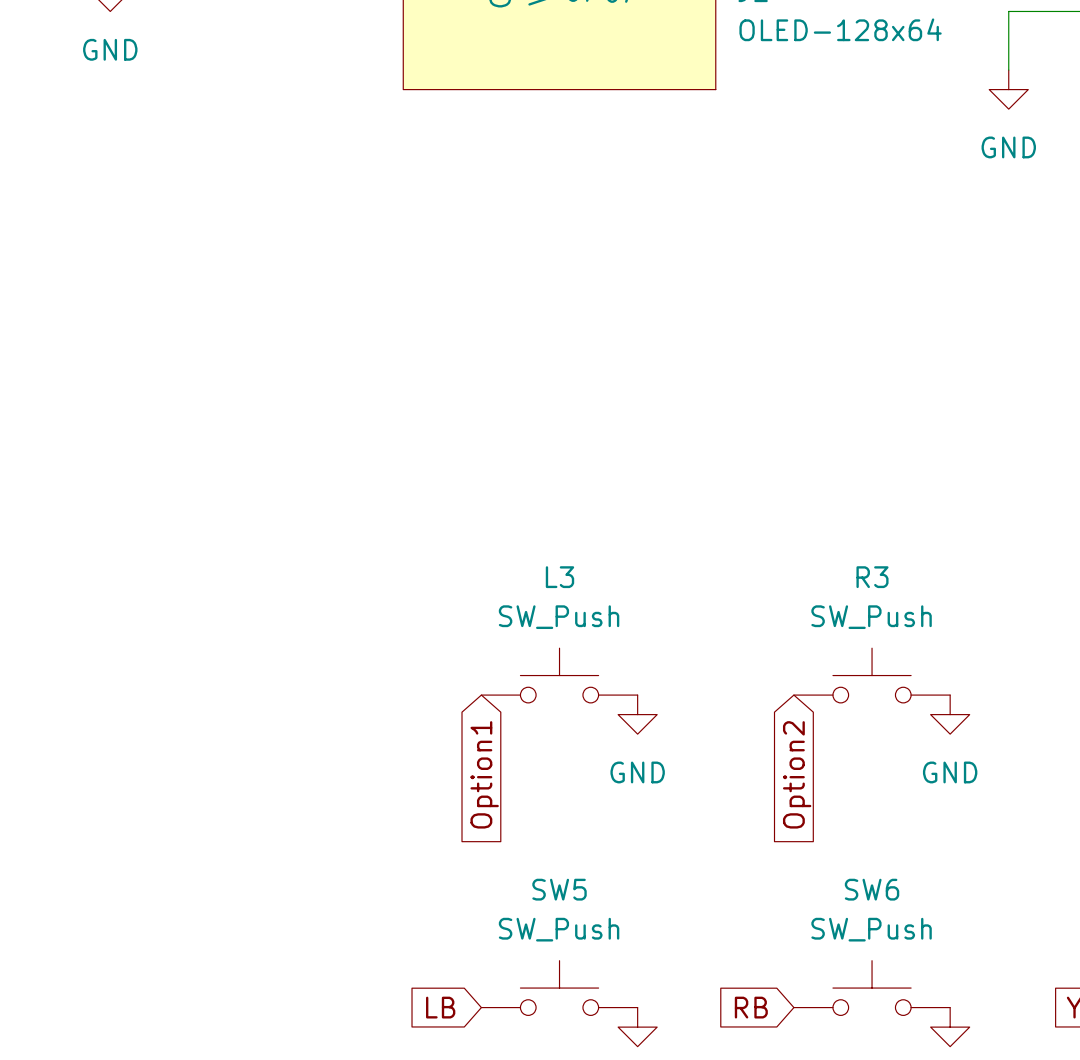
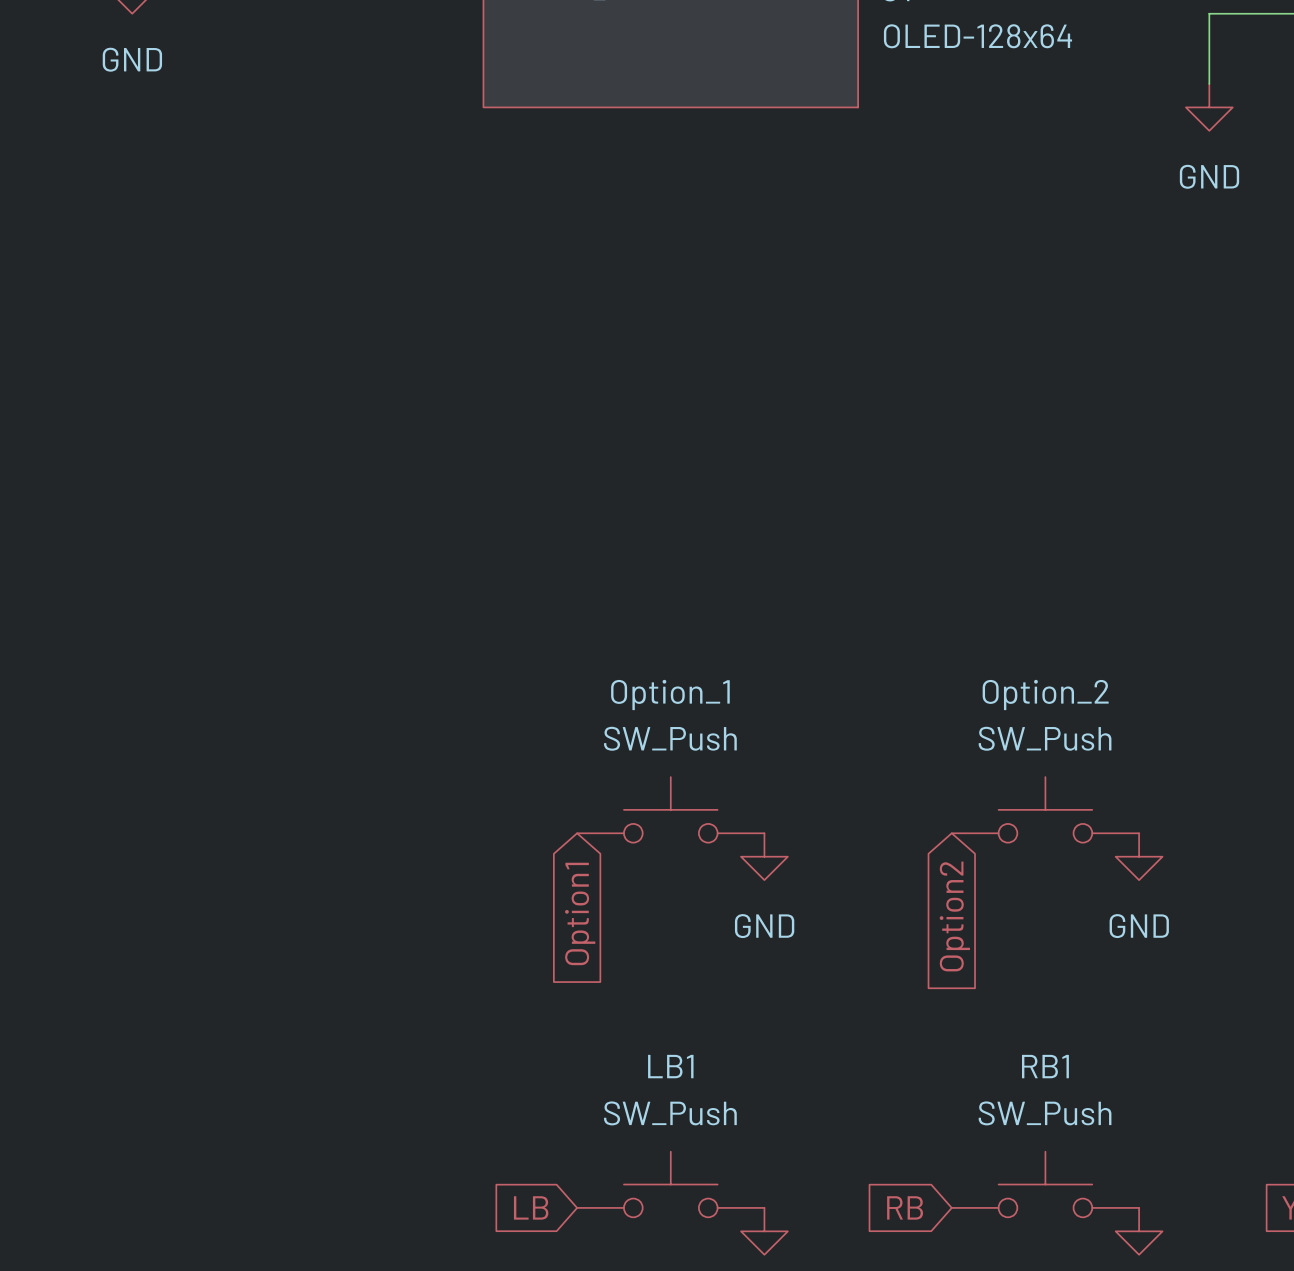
L3 name: L3 (559, 577) -> Option_1 (670, 695)
R3 name: R3 (872, 577) -> Option_2 (1045, 695)
SW5 name: SW5 (559, 889) -> LB1 (670, 1066)
SW6 name: SW6 (872, 889) -> RB1 (1045, 1066)

